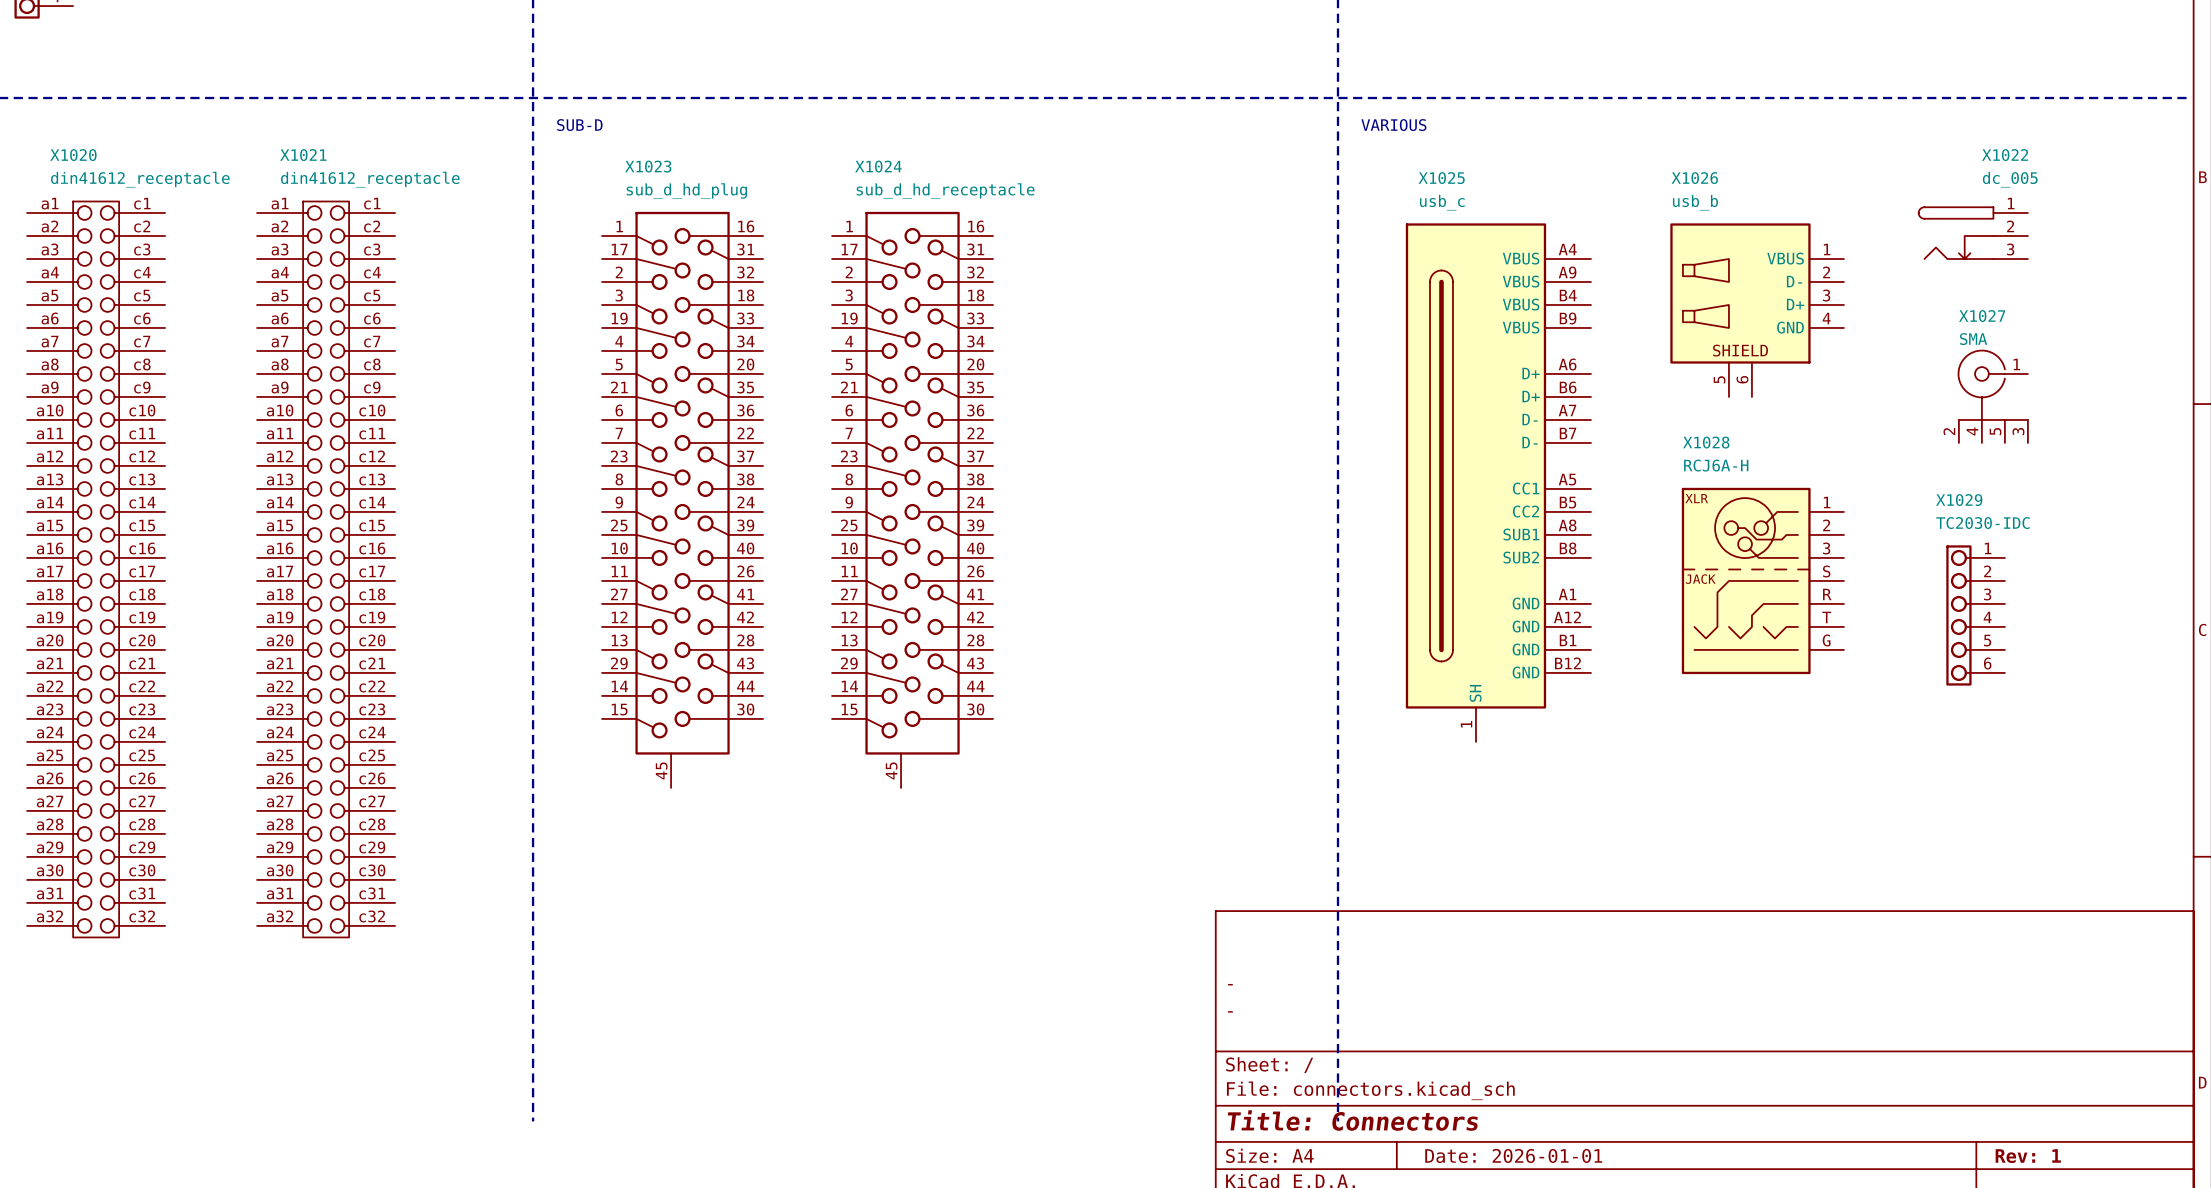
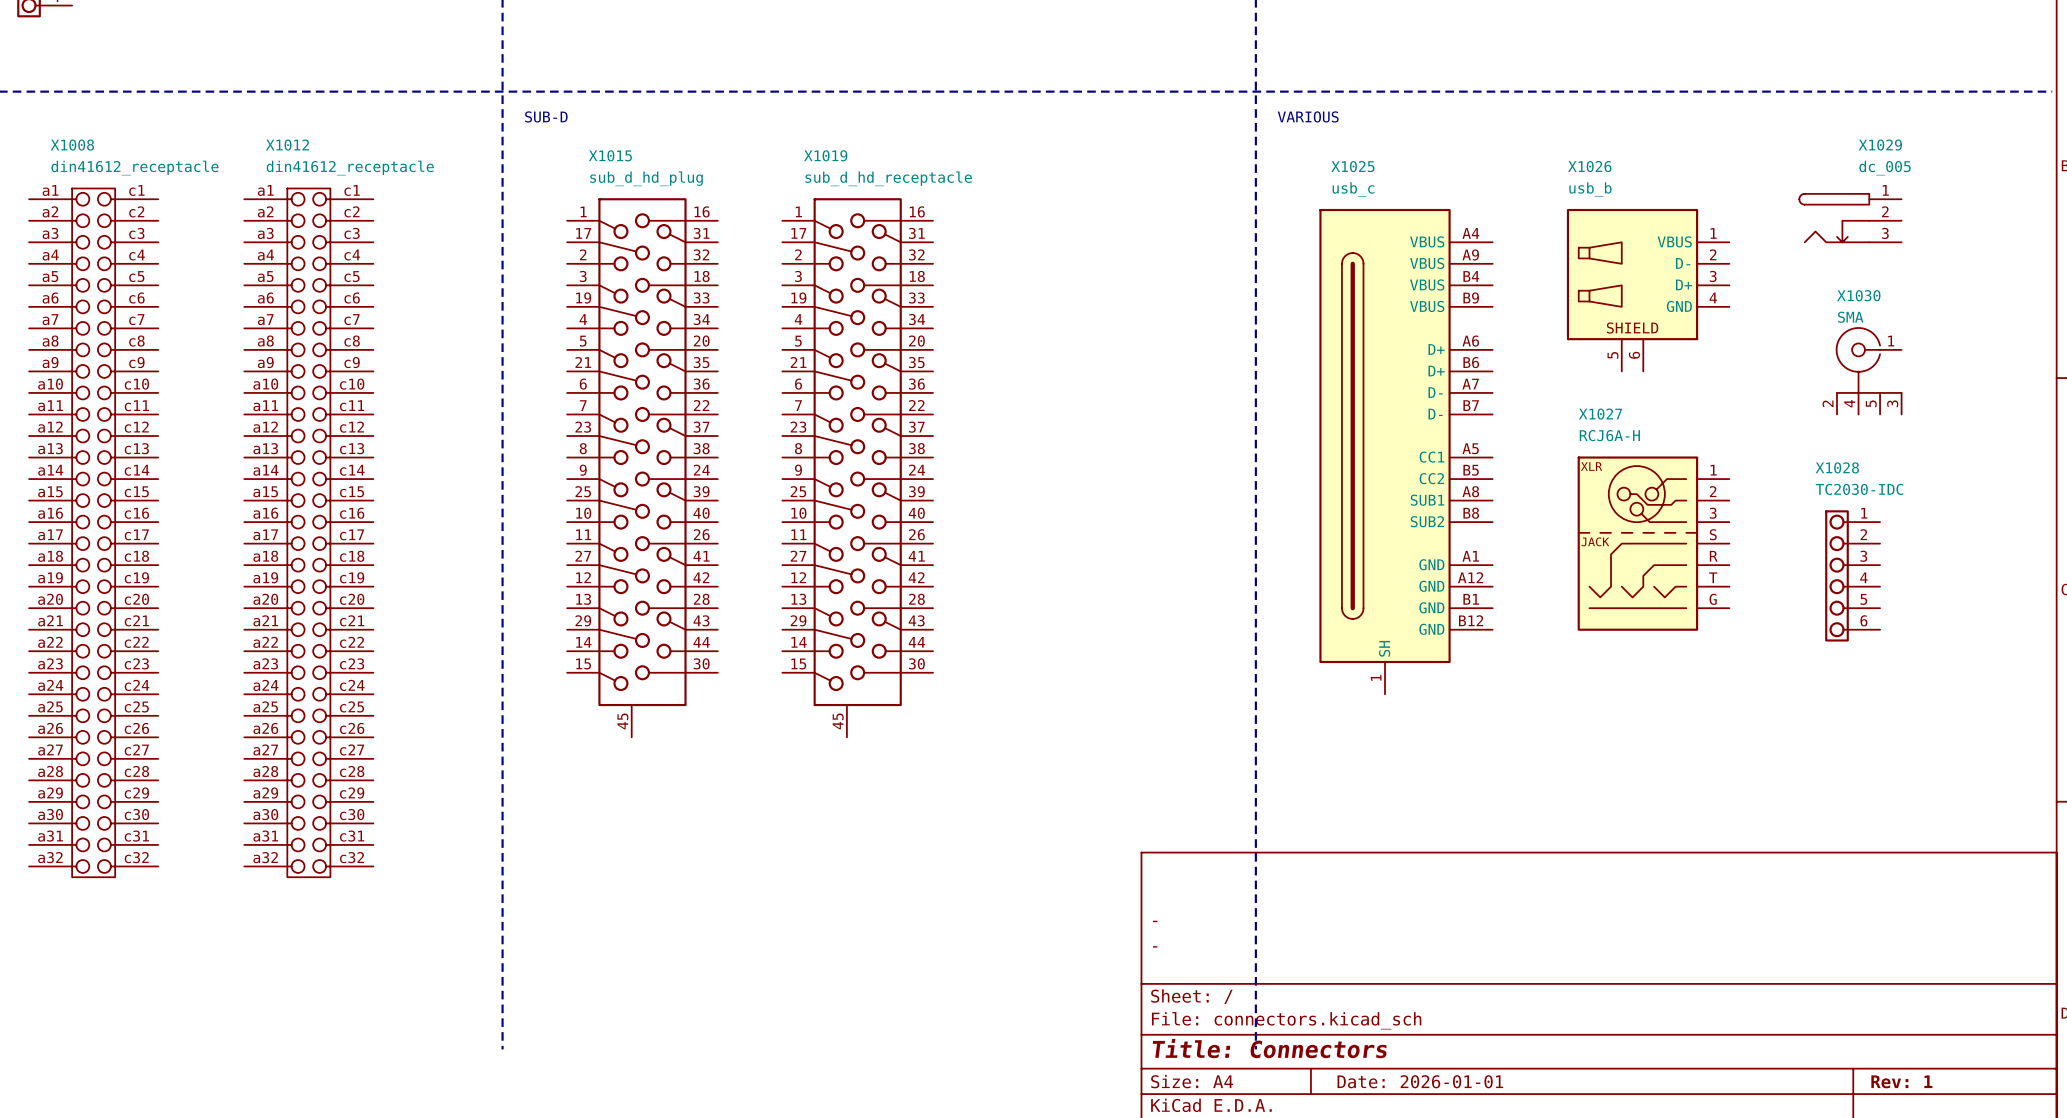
X1020 name: X1020 (73, 155) -> X1008 (72, 145)
X1021 name: X1021 (303, 155) -> X1012 (287, 145)
X1022 name: X1022 (2005, 155) -> X1029 (1880, 145)
X1023 name: X1023 (648, 166) -> X1015 (610, 155)
X1024 name: X1024 (878, 166) -> X1019 (825, 155)
X1027 name: X1027 (1982, 316) -> X1030 (1858, 295)
X1028 name: X1028 (1706, 442) -> X1027 (1600, 414)
X1029 name: X1029 (1959, 500) -> X1028 (1837, 467)

